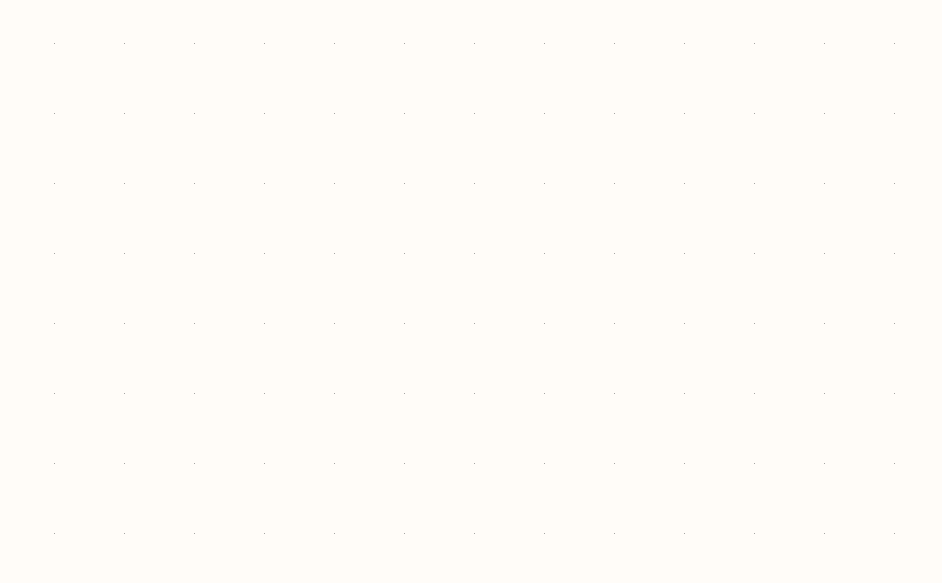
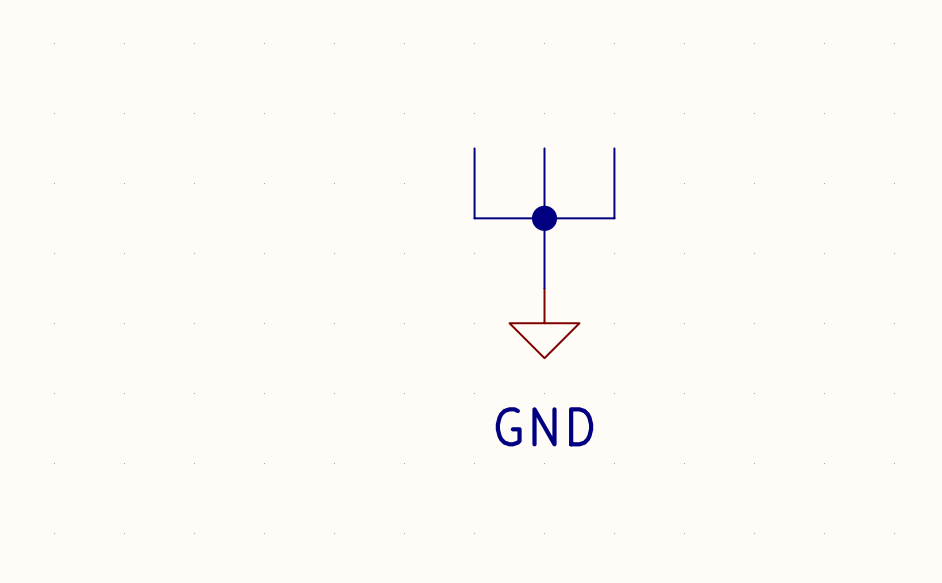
wire: none -> (474, 148) (474, 218) (614, 218) (614, 148)
wire: none -> (544, 148) (544, 288)
junction: none -> (544, 218)
power symbol: none -> GND (544, 323)

